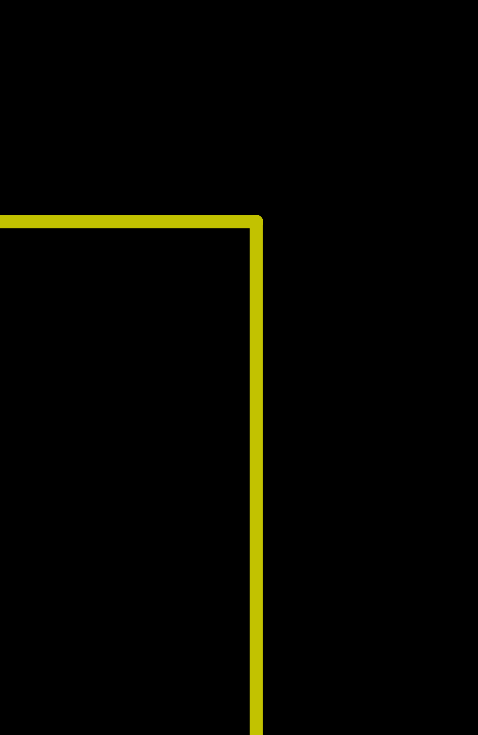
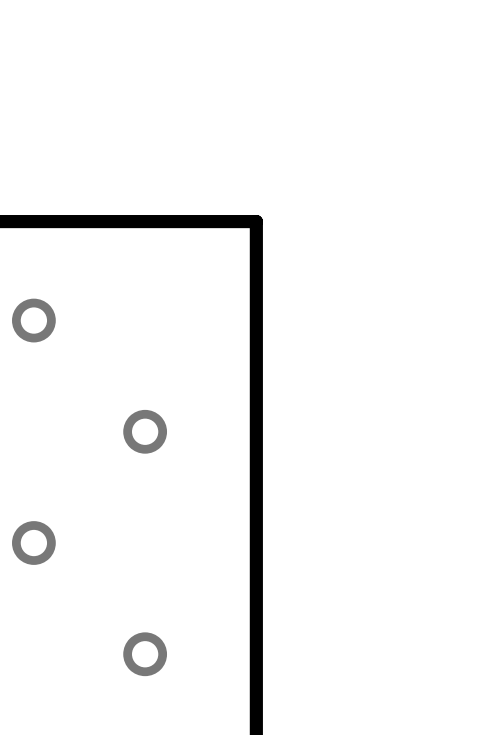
via: none -> (33, 320)
via: none -> (145, 431)
via: none -> (33, 543)
via: none -> (145, 654)

